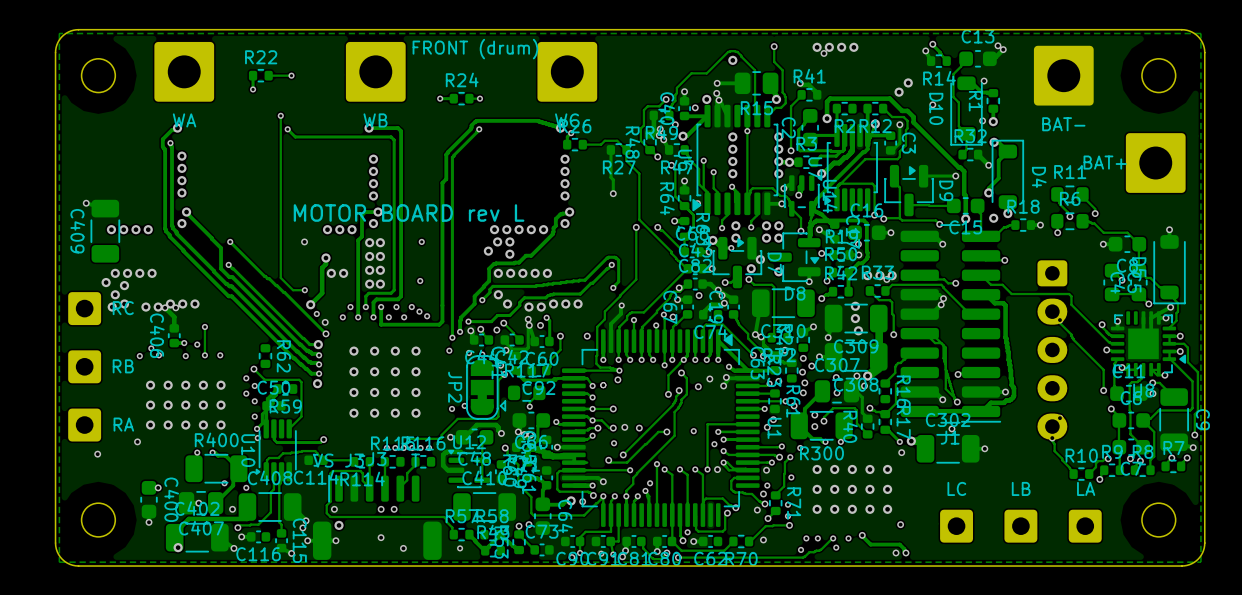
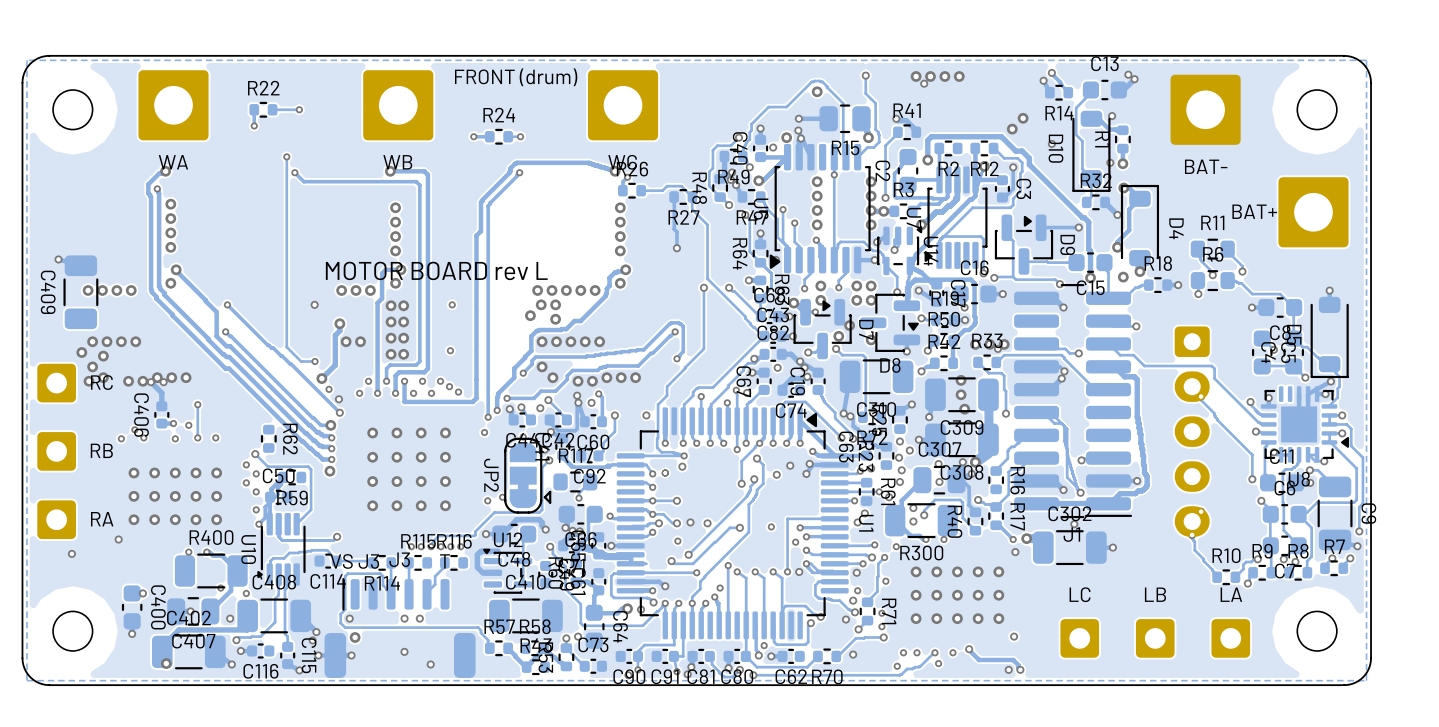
track: (621, 305) (620, 313) (611, 323) (611, 341) -> none
via: (621, 305) -> none
via: (469, 352) -> none
via: (257, 438) -> none
via: (460, 548) -> none
via: (601, 553) -> none

